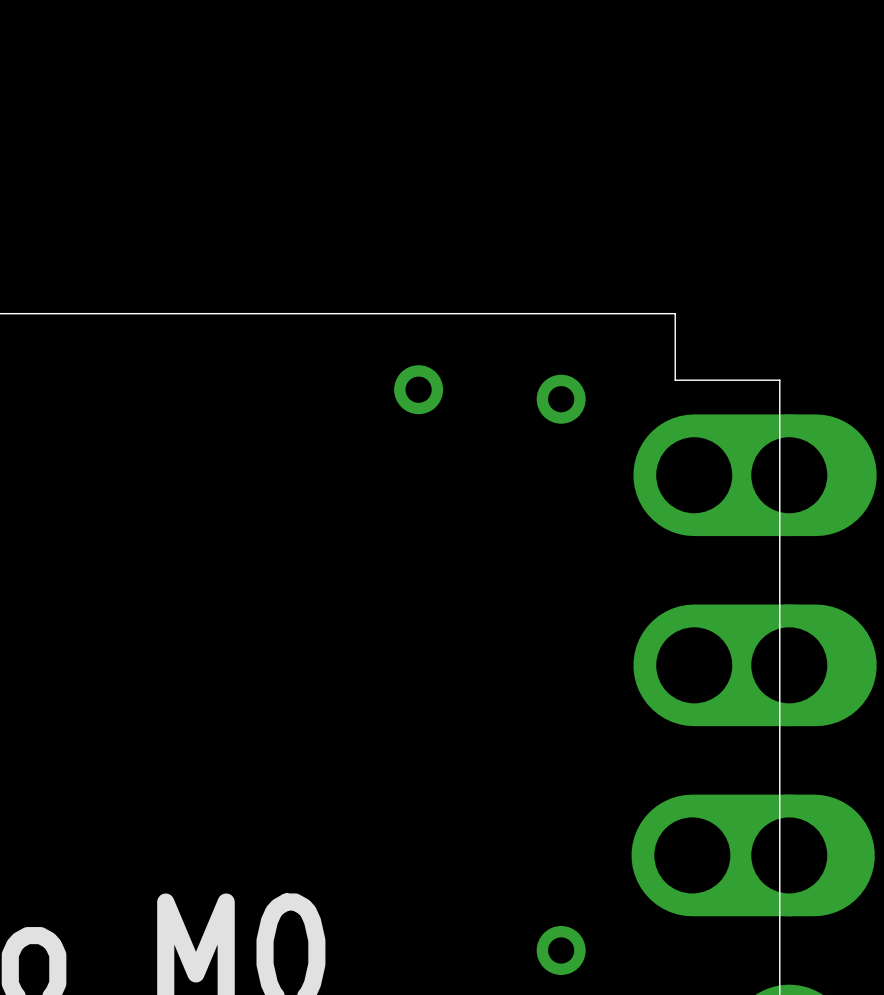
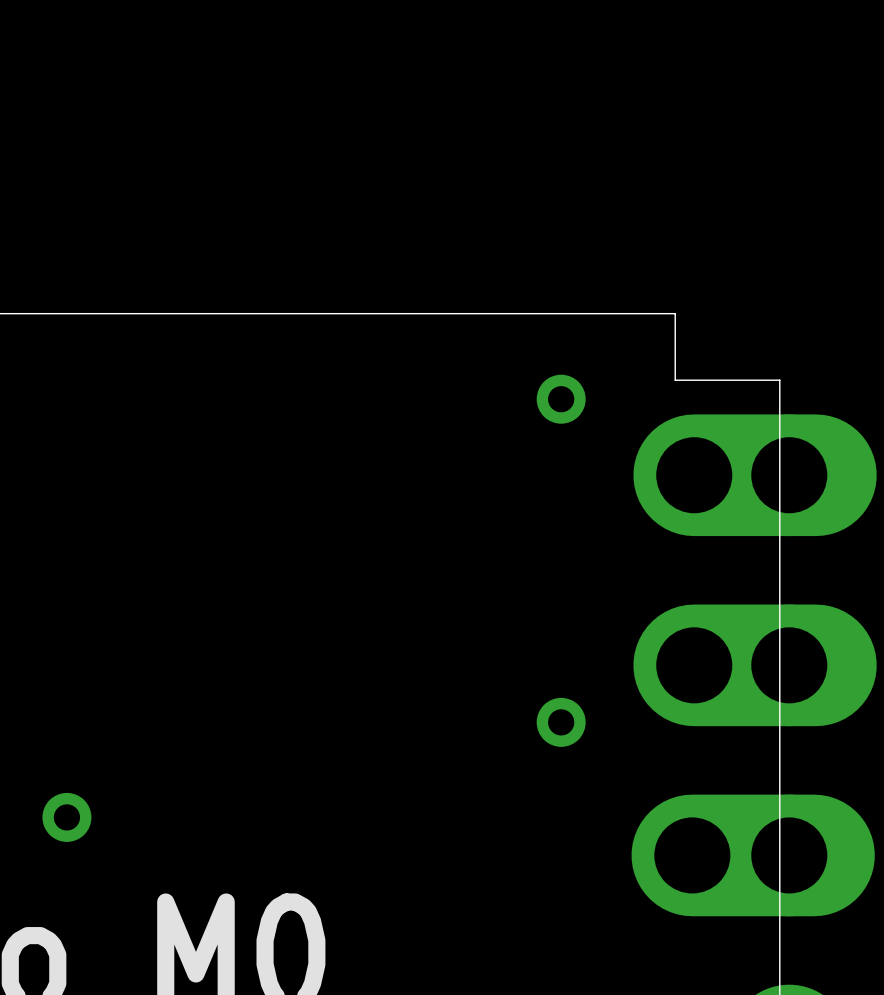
via: (418, 389) -> none
via: none -> (561, 722)
via: none -> (66, 817)
via: (561, 950) -> none

